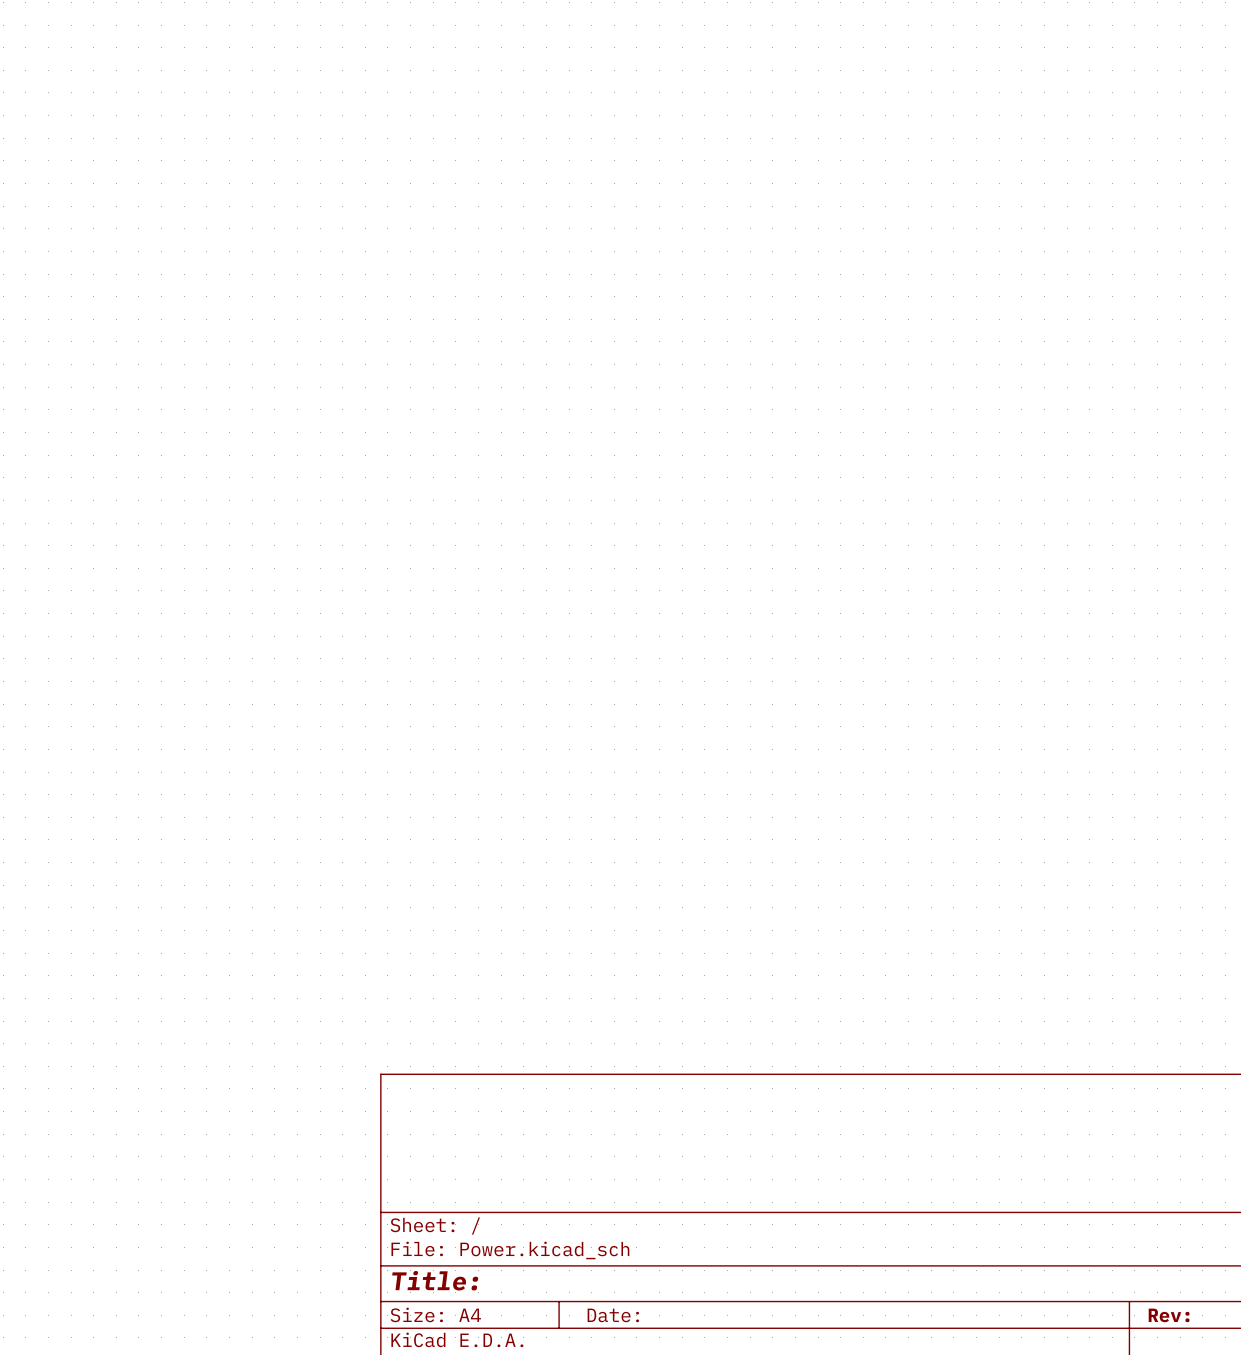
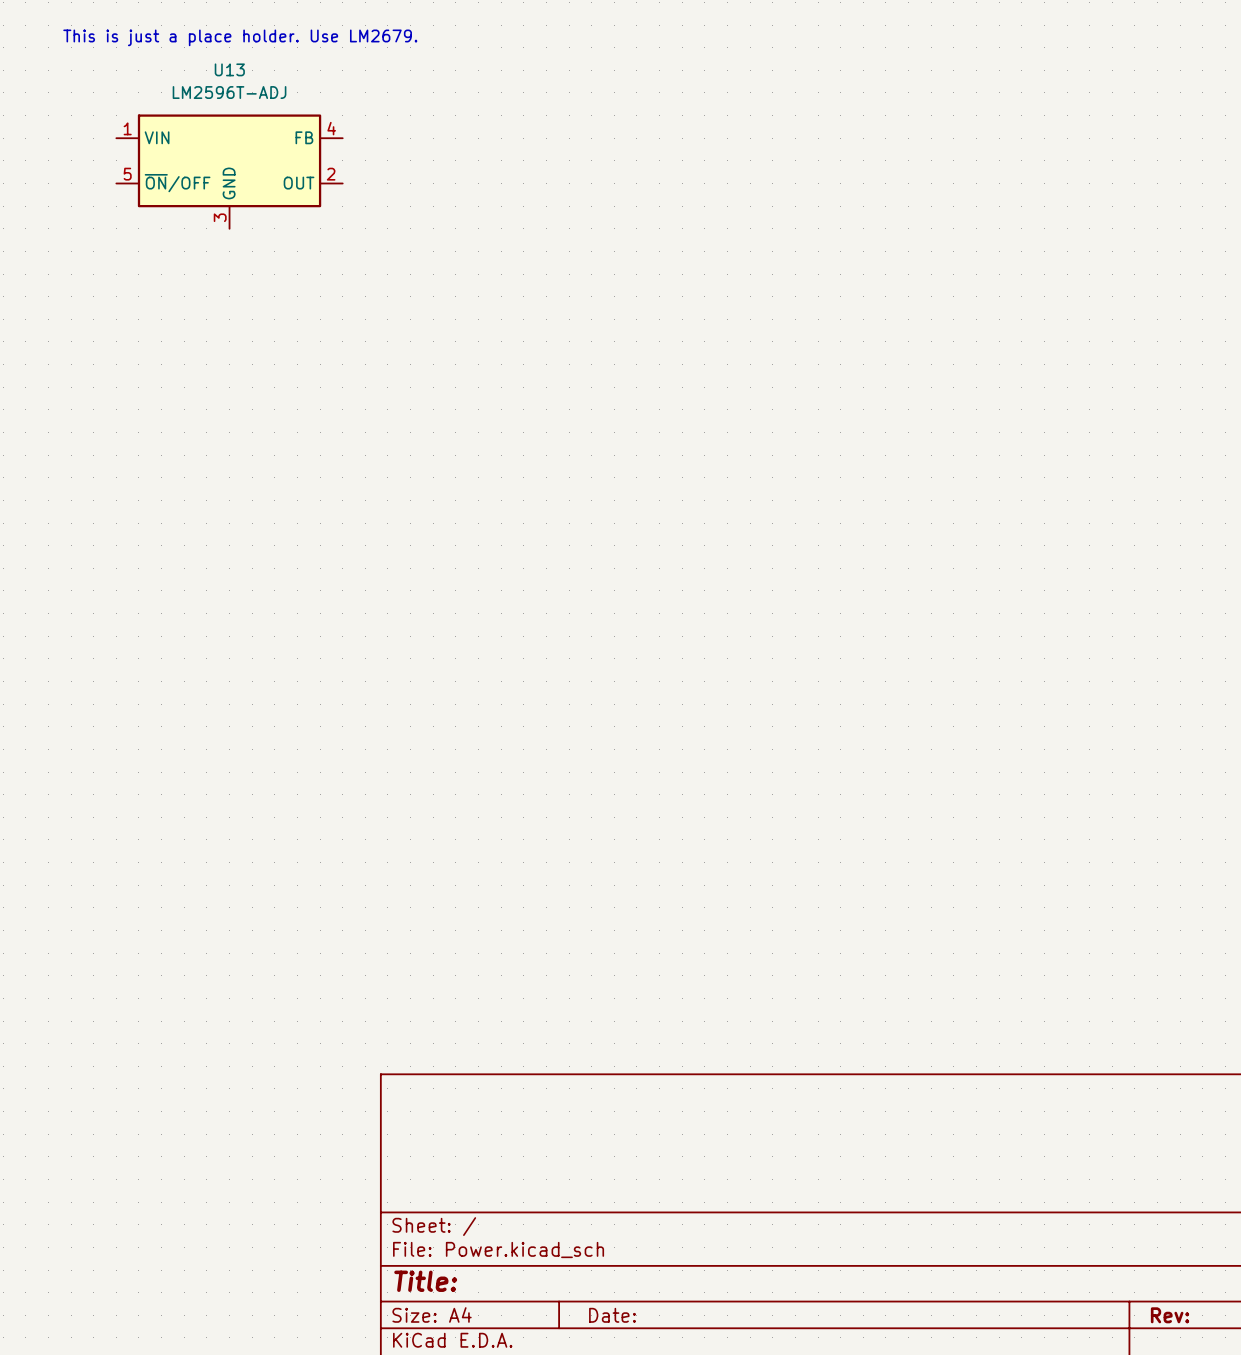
text: none -> This is just a place holder. Use LM2679. (240, 37)
U13: none -> LM2596T-ADJ (229, 171)

